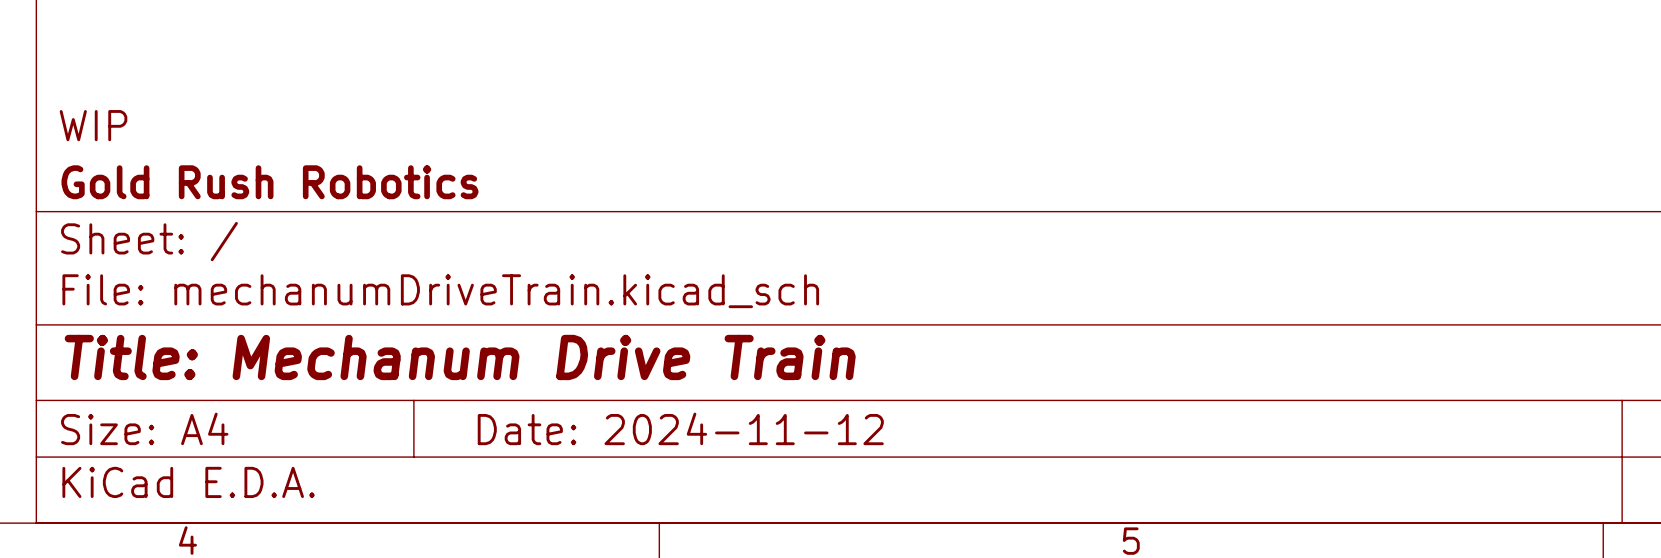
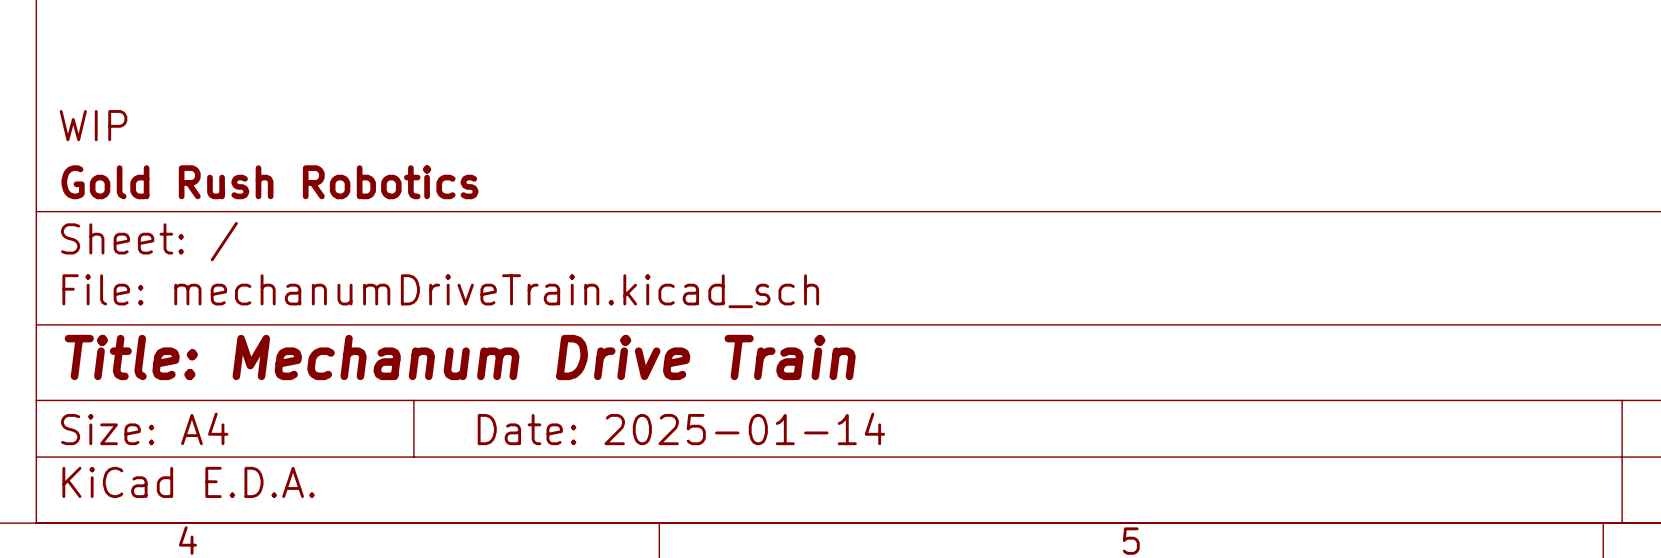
title block: Date: 2024-11-12 (680, 428) -> Date: 2025-01-14 (681, 428)

